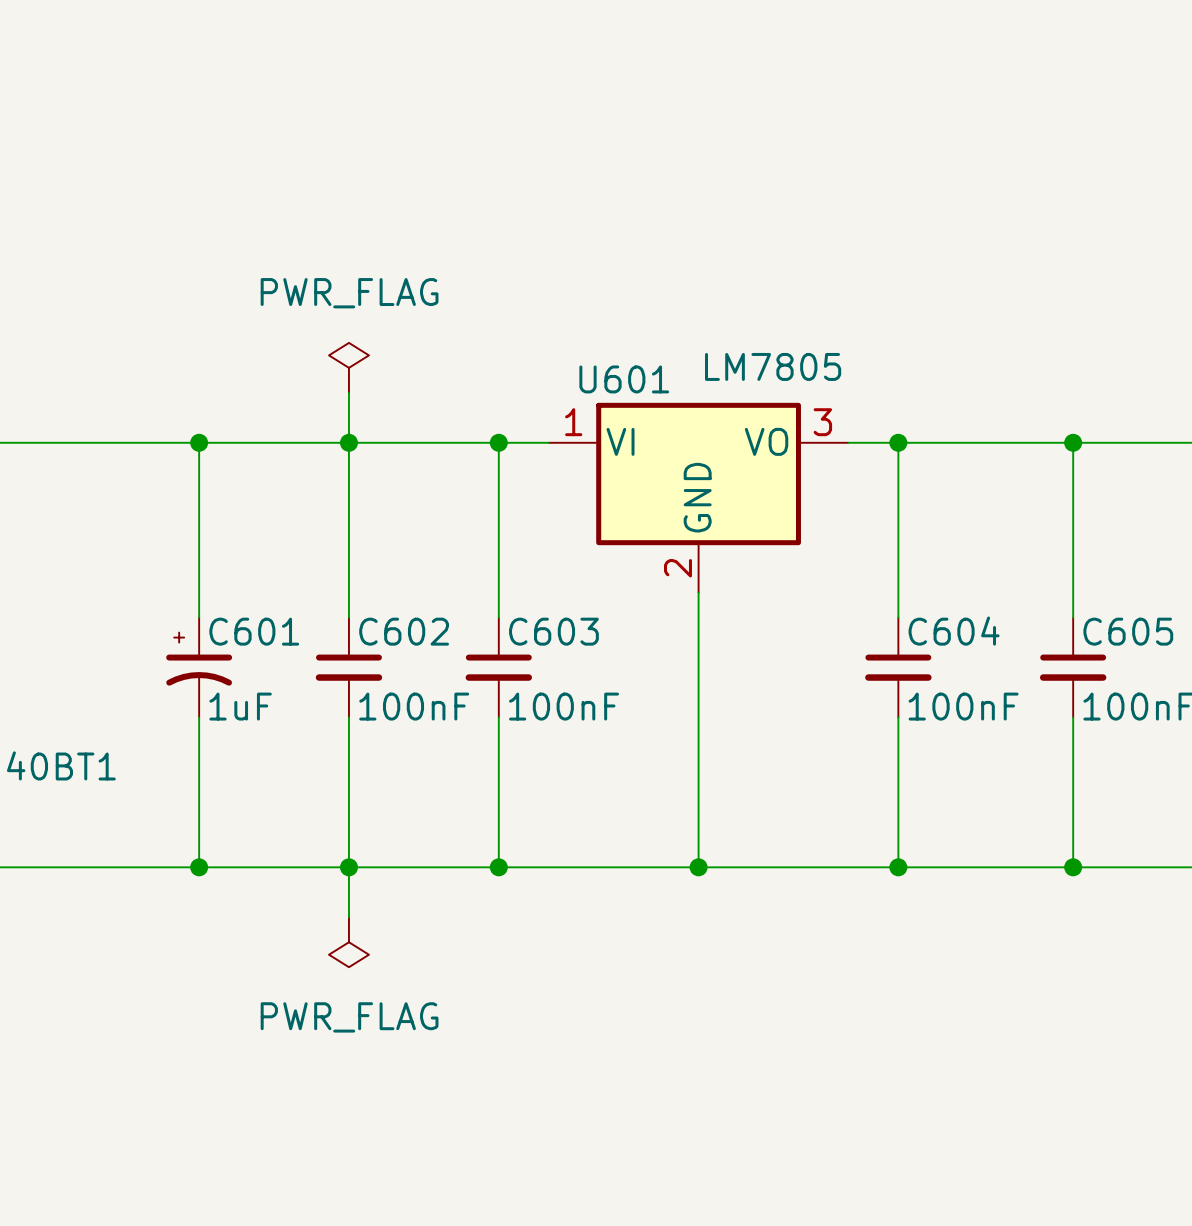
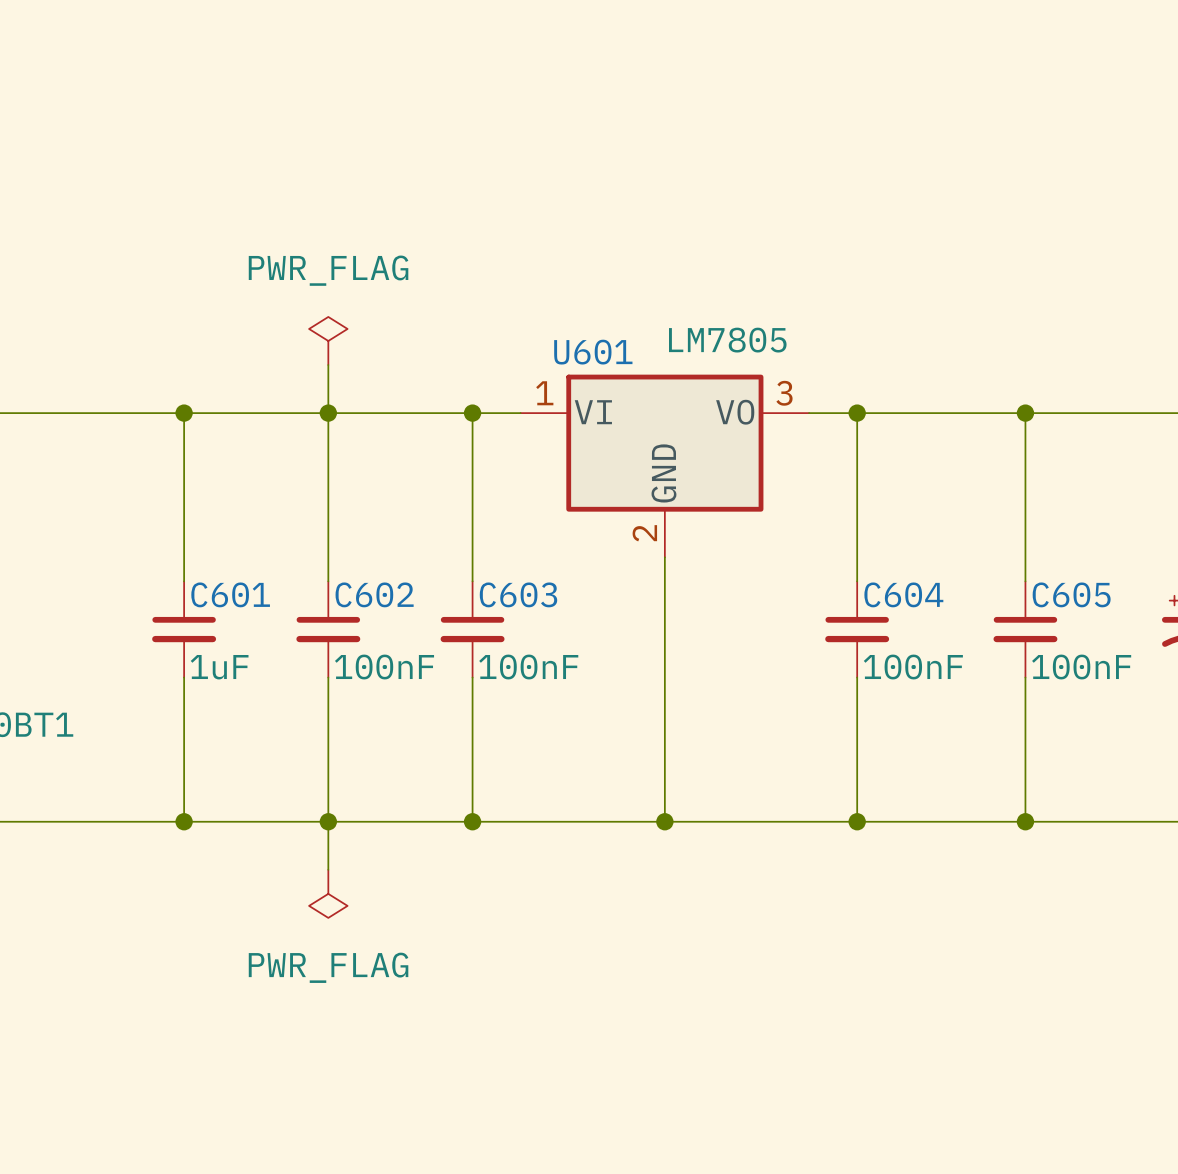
C601 symbol: [166, 617, 233, 718] -> [152, 581, 217, 678]

